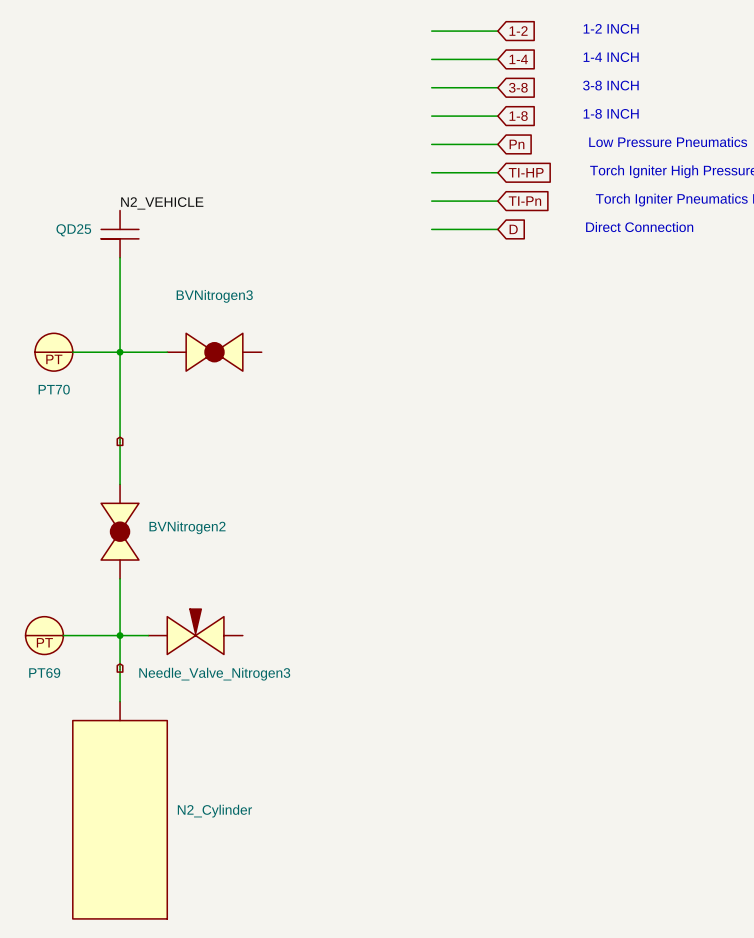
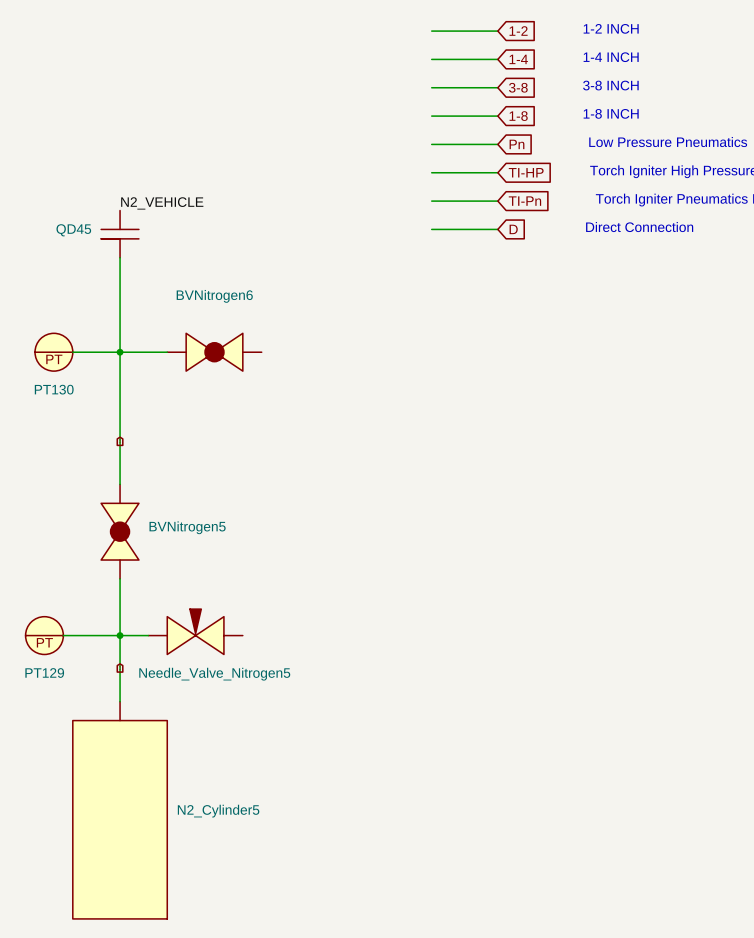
QD25 name: QD25 (73, 230) -> QD45 (73, 230)
BVNitrogen3 name: BVNitrogen3 (214, 296) -> BVNitrogen6 (214, 296)
PT70 name: PT70 (54, 389) -> PT130 (54, 389)
BVNitrogen2 name: BVNitrogen2 (187, 527) -> BVNitrogen5 (187, 527)
PT69 name: PT69 (44, 673) -> PT129 (44, 673)
Needle_Valve_Nitrogen3 name: Needle_Valve_Nitrogen3 (214, 674) -> Needle_Valve_Nitrogen5 (214, 674)
N2_Cylinder name: N2_Cylinder (214, 811) -> N2_Cylinder5 (218, 811)

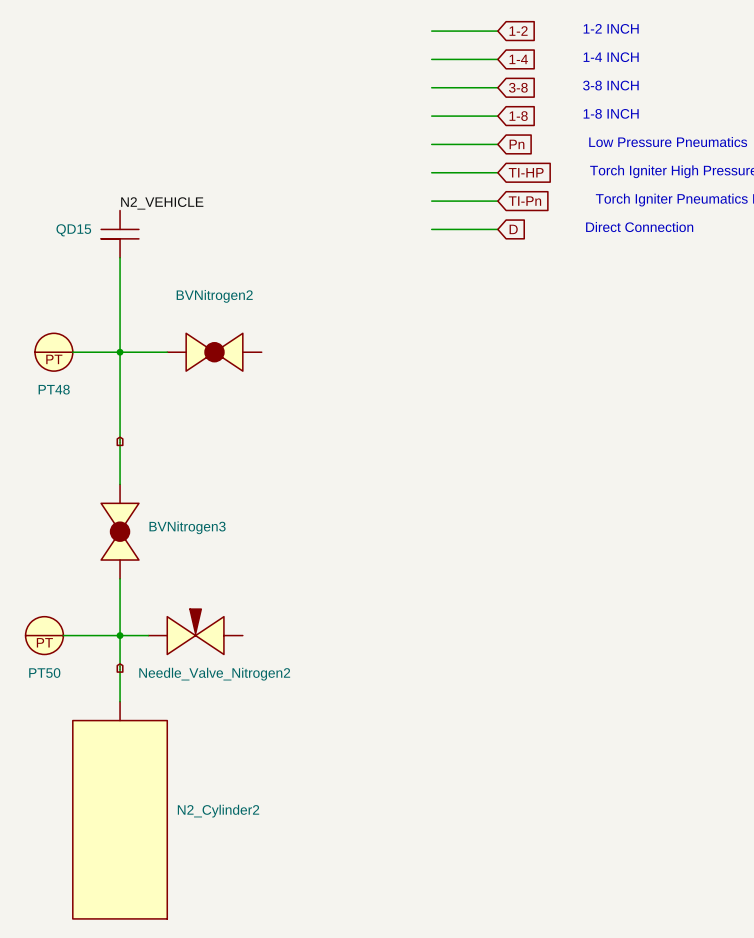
QD45 name: QD45 (73, 230) -> QD15 (73, 230)
BVNitrogen6 name: BVNitrogen6 (214, 296) -> BVNitrogen2 (214, 296)
PT130 name: PT130 (54, 389) -> PT48 (54, 389)
BVNitrogen5 name: BVNitrogen5 (187, 527) -> BVNitrogen3 (187, 527)
PT129 name: PT129 (44, 673) -> PT50 (44, 673)
Needle_Valve_Nitrogen5 name: Needle_Valve_Nitrogen5 (214, 674) -> Needle_Valve_Nitrogen2 (214, 674)
N2_Cylinder5 name: N2_Cylinder5 (218, 811) -> N2_Cylinder2 (218, 811)

